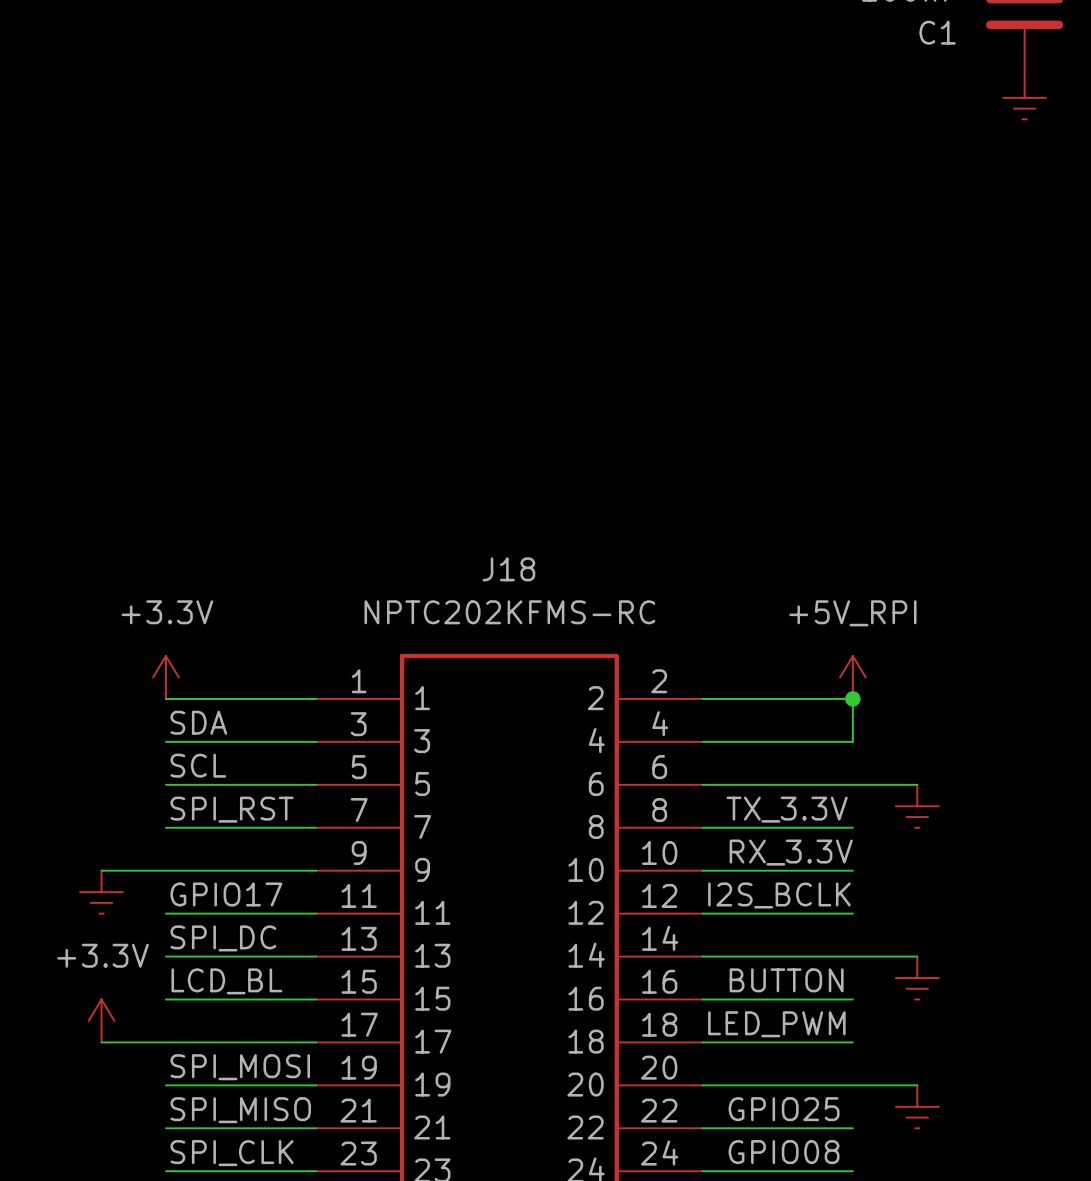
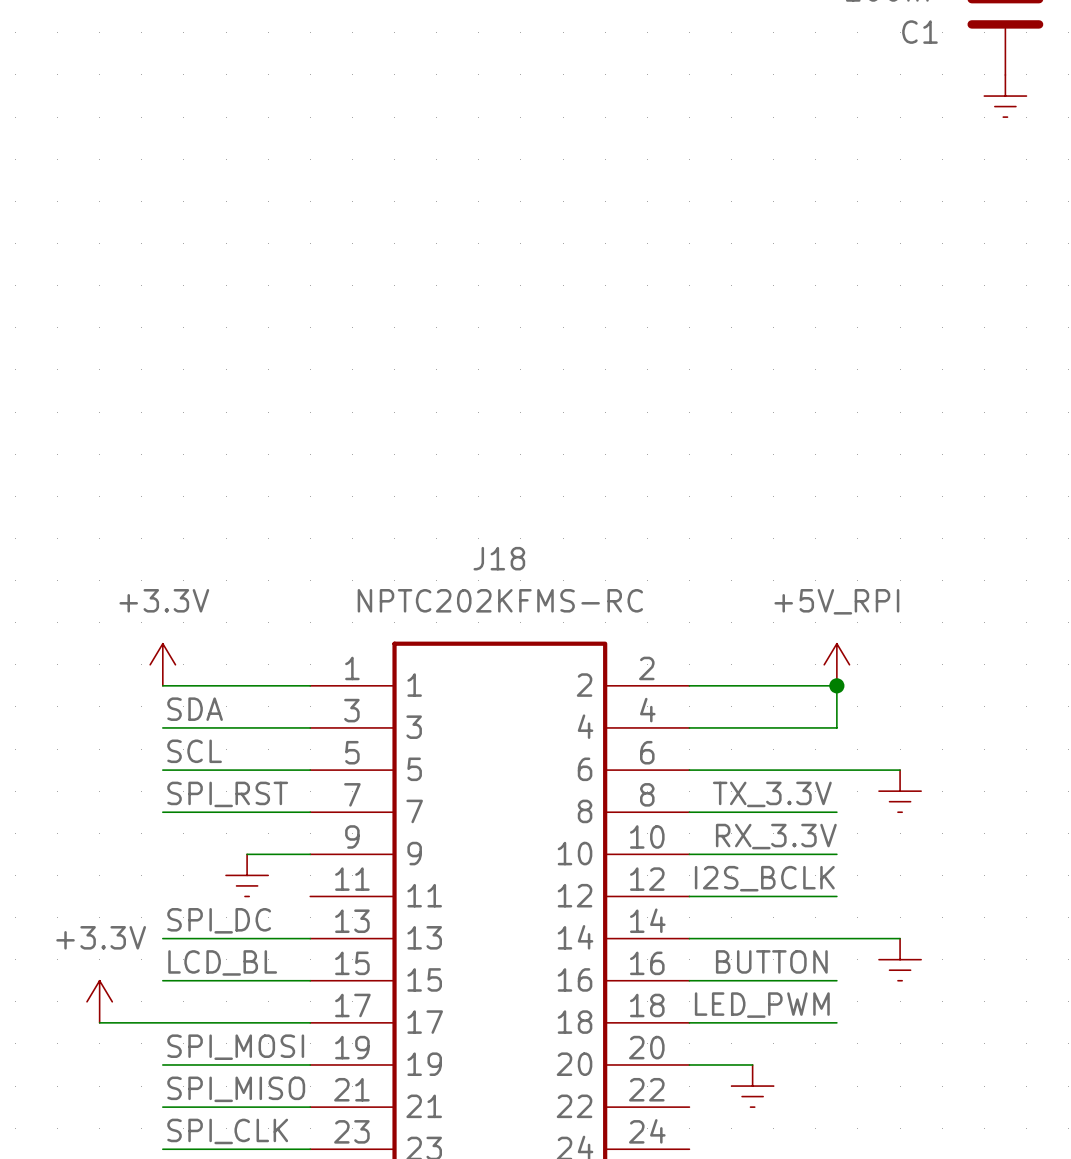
wire: (101, 870) (251, 870) -> none
power symbol position: (101, 892) -> (247, 875)
label: GPIO17 (226, 894) -> none
wire: (165, 913) (316, 913) -> none
wire: (767, 1085) (917, 1085) -> none
power symbol position: (917, 1106) -> (752, 1086)
label: GPIO25 (784, 1109) -> none
wire: (702, 1128) (852, 1128) -> none
label: GPIO08 (784, 1152) -> none
wire: (702, 1171) (852, 1171) -> none

